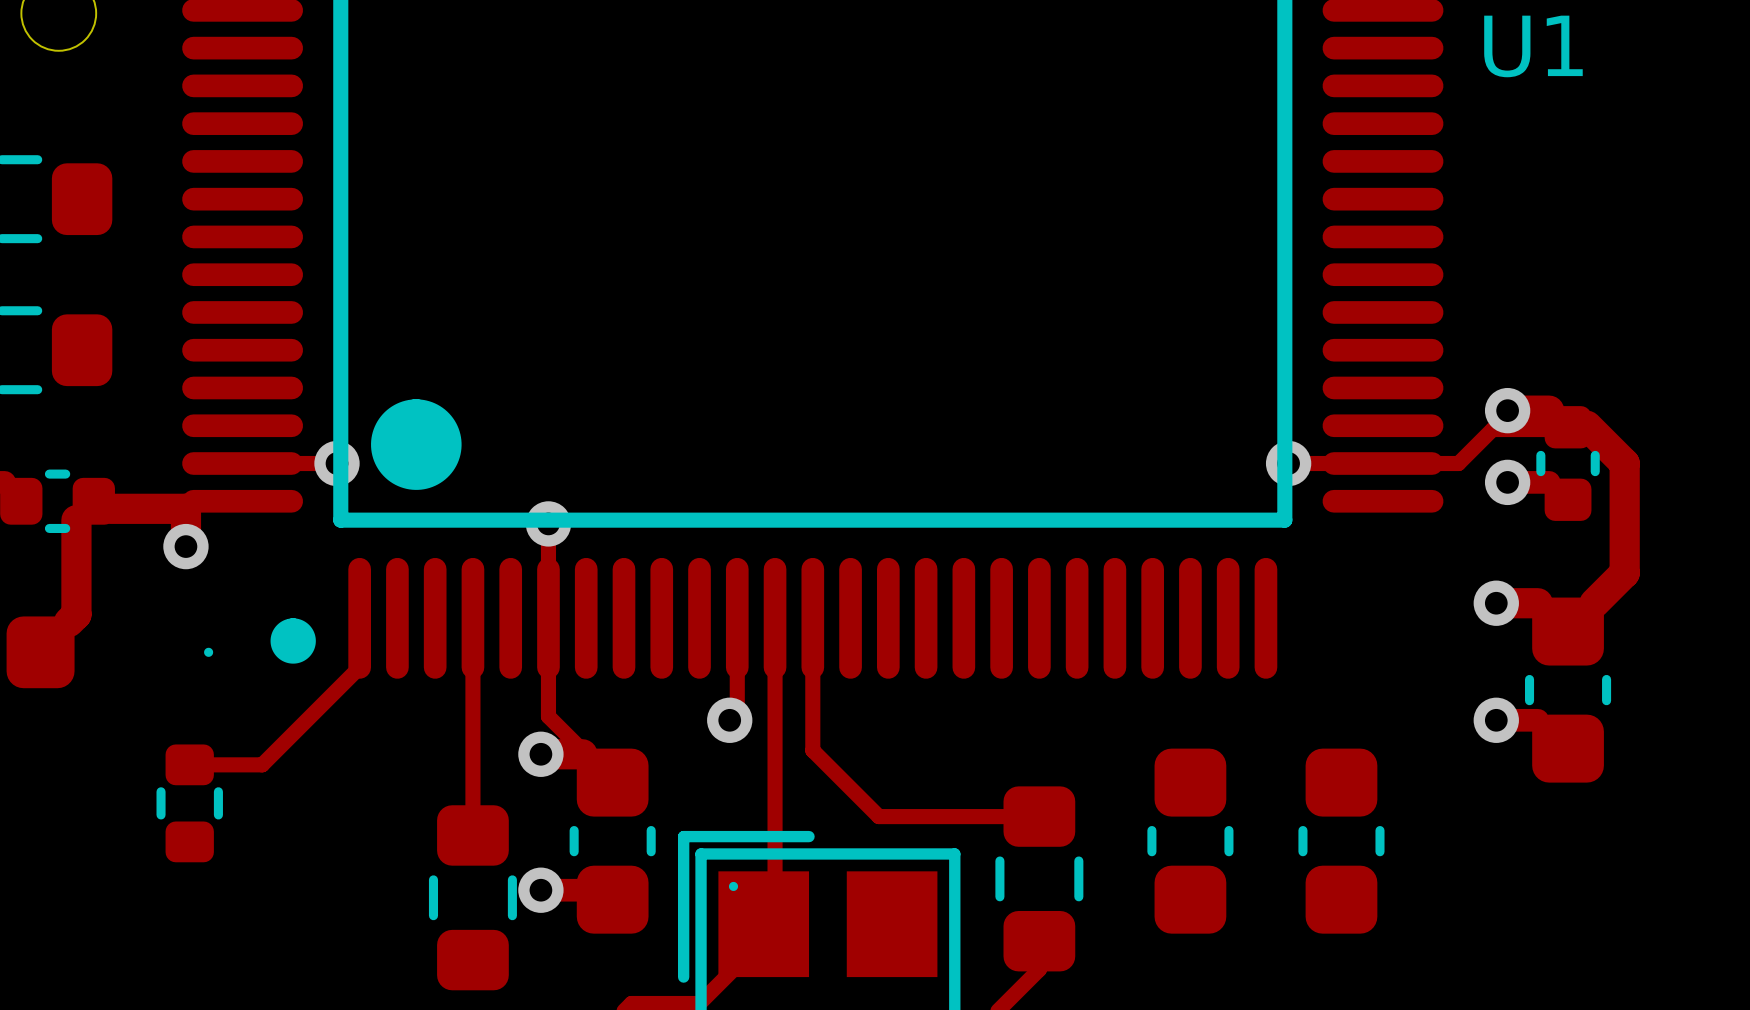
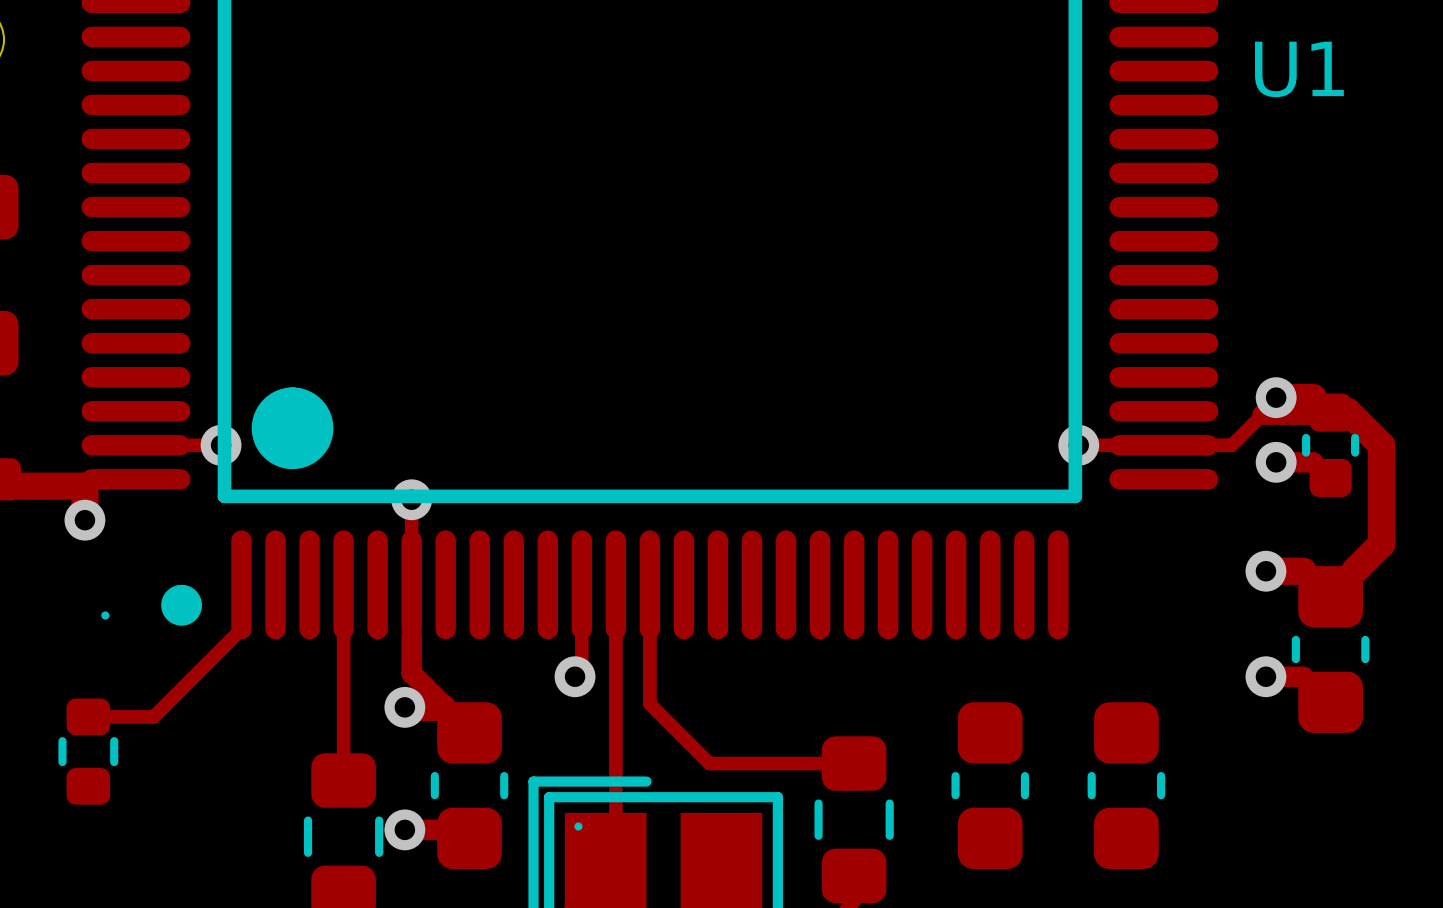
top track width: thin (1492, 429) (1549, 429) -> thick (1262, 414) (1313, 414)
top track width: thin (548, 674) (548, 716) (586, 754) -> thick (411, 635) (411, 673) (445, 707)

